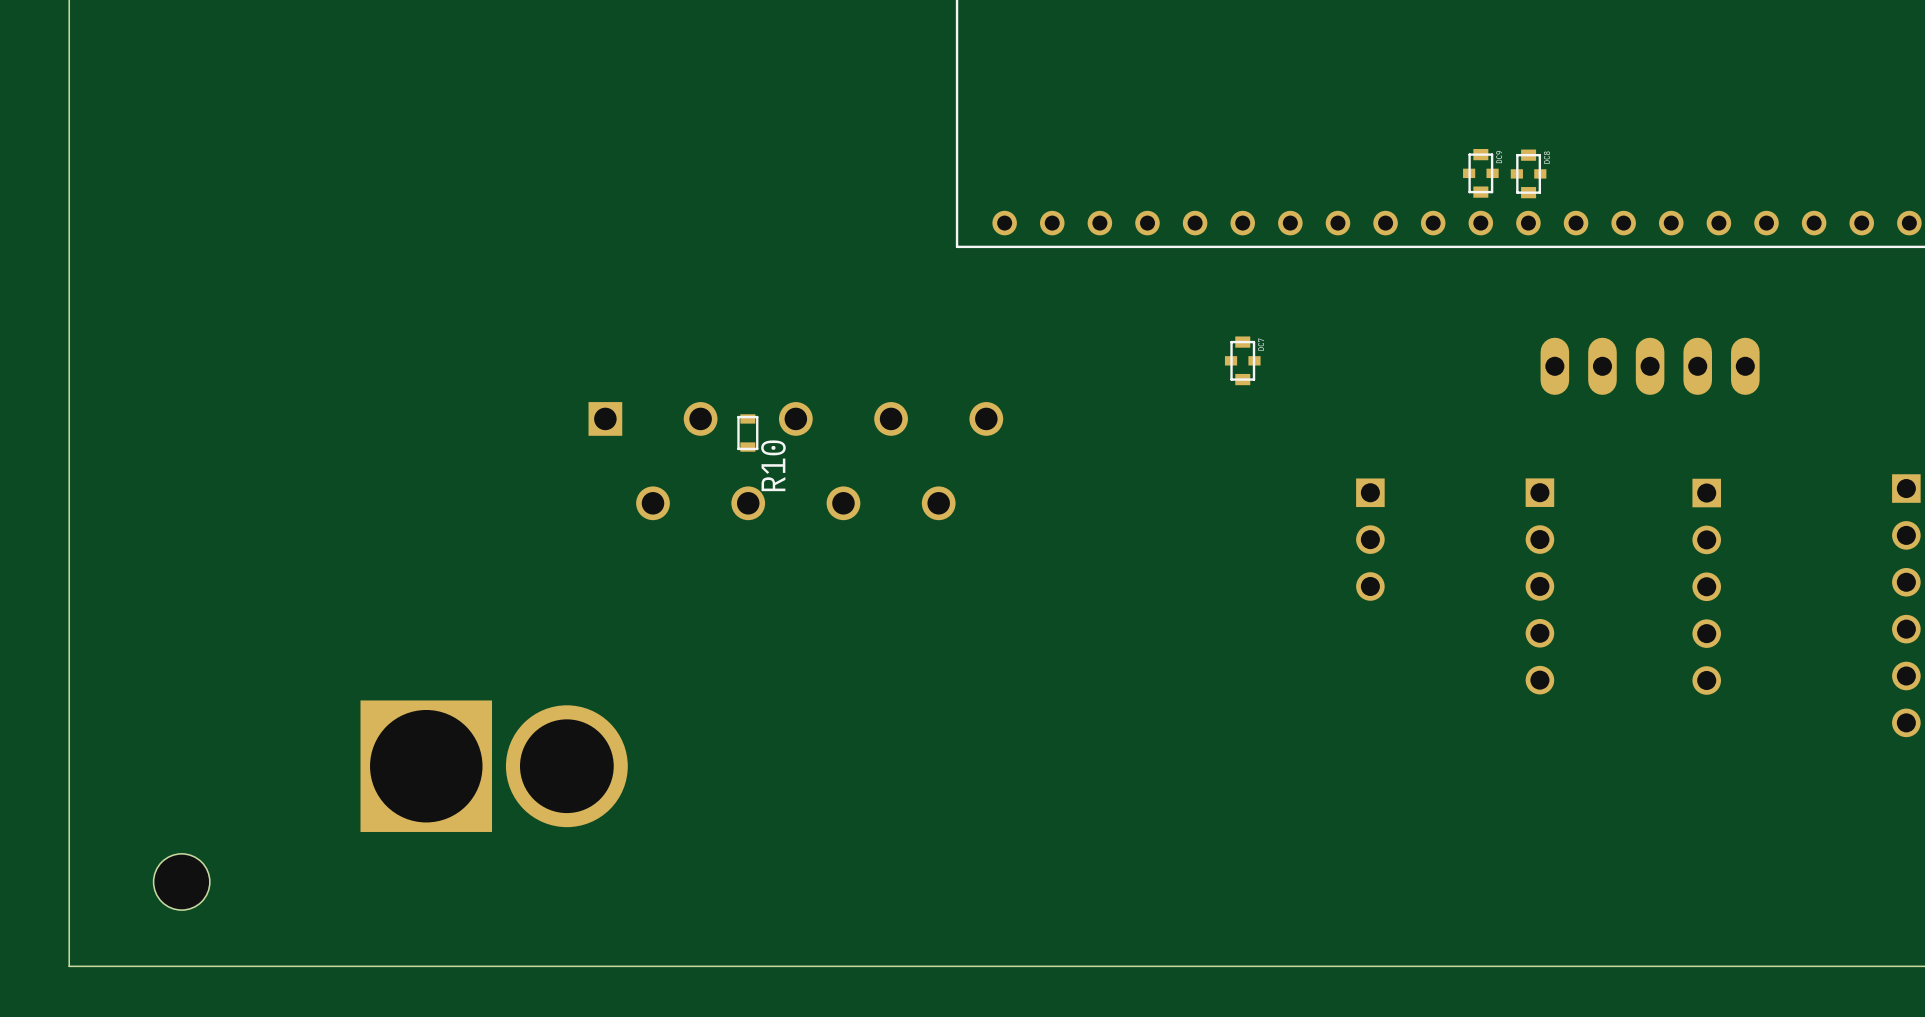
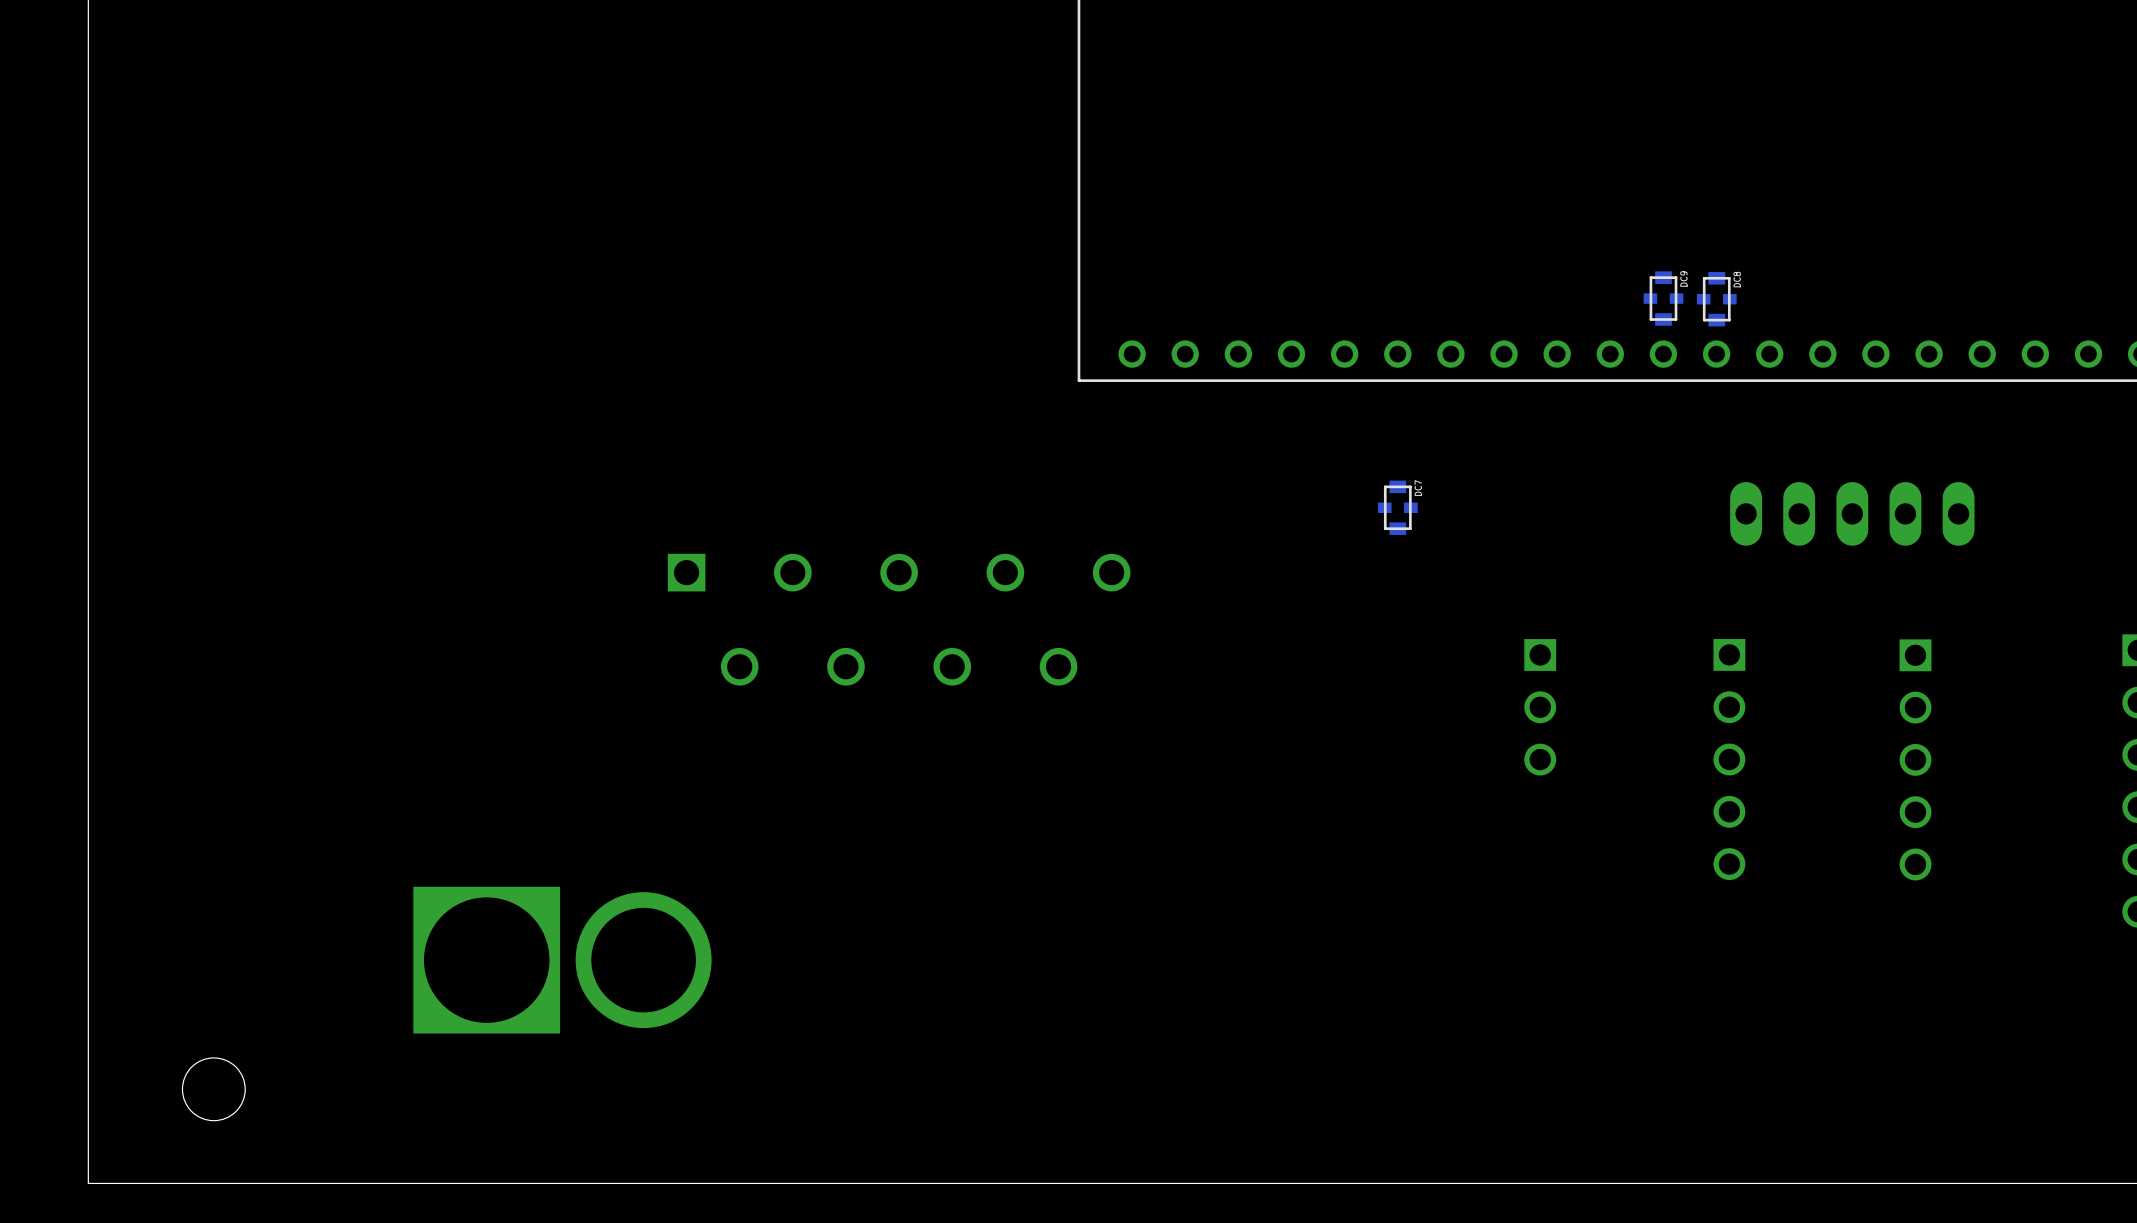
R10: (747, 432) -> none

